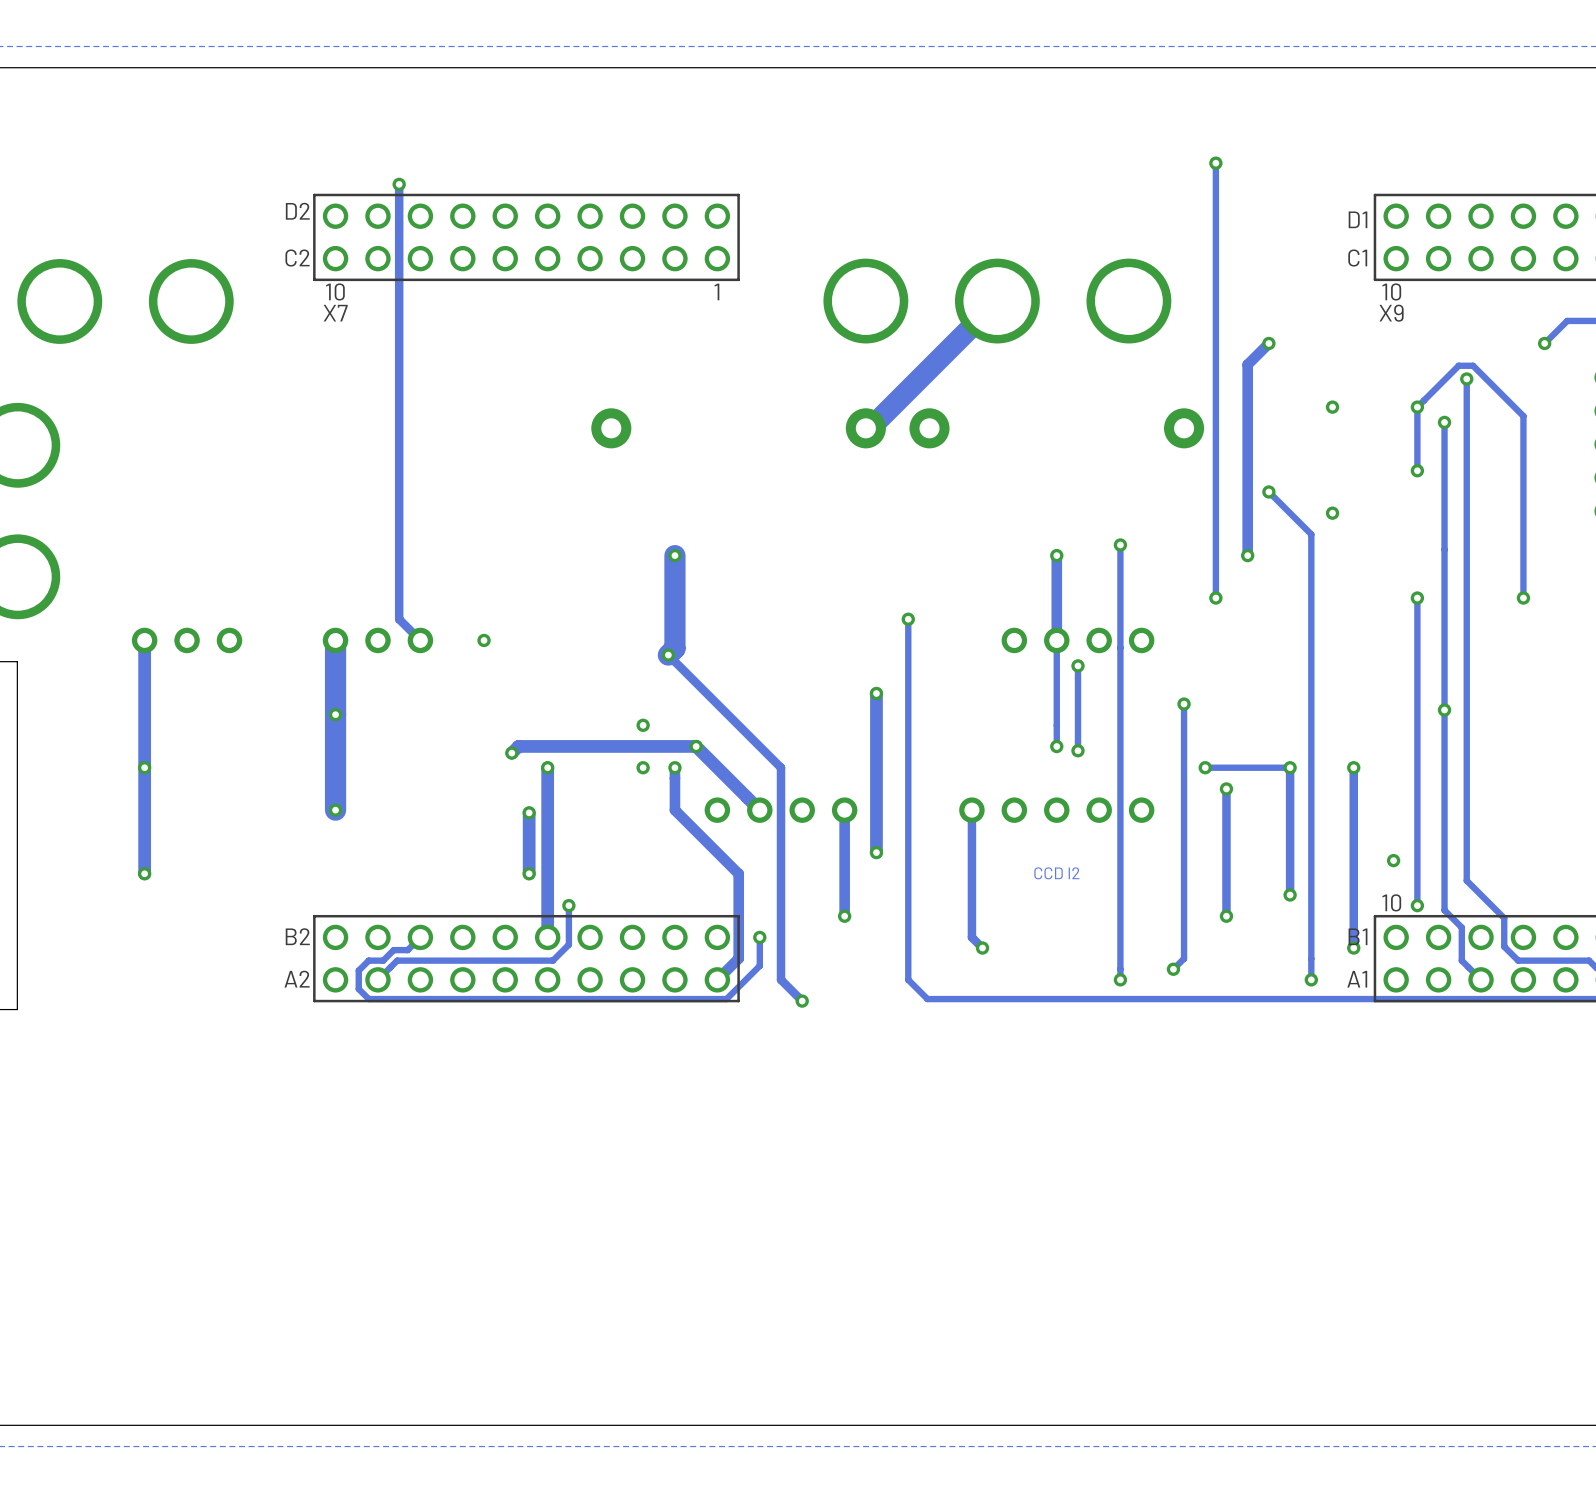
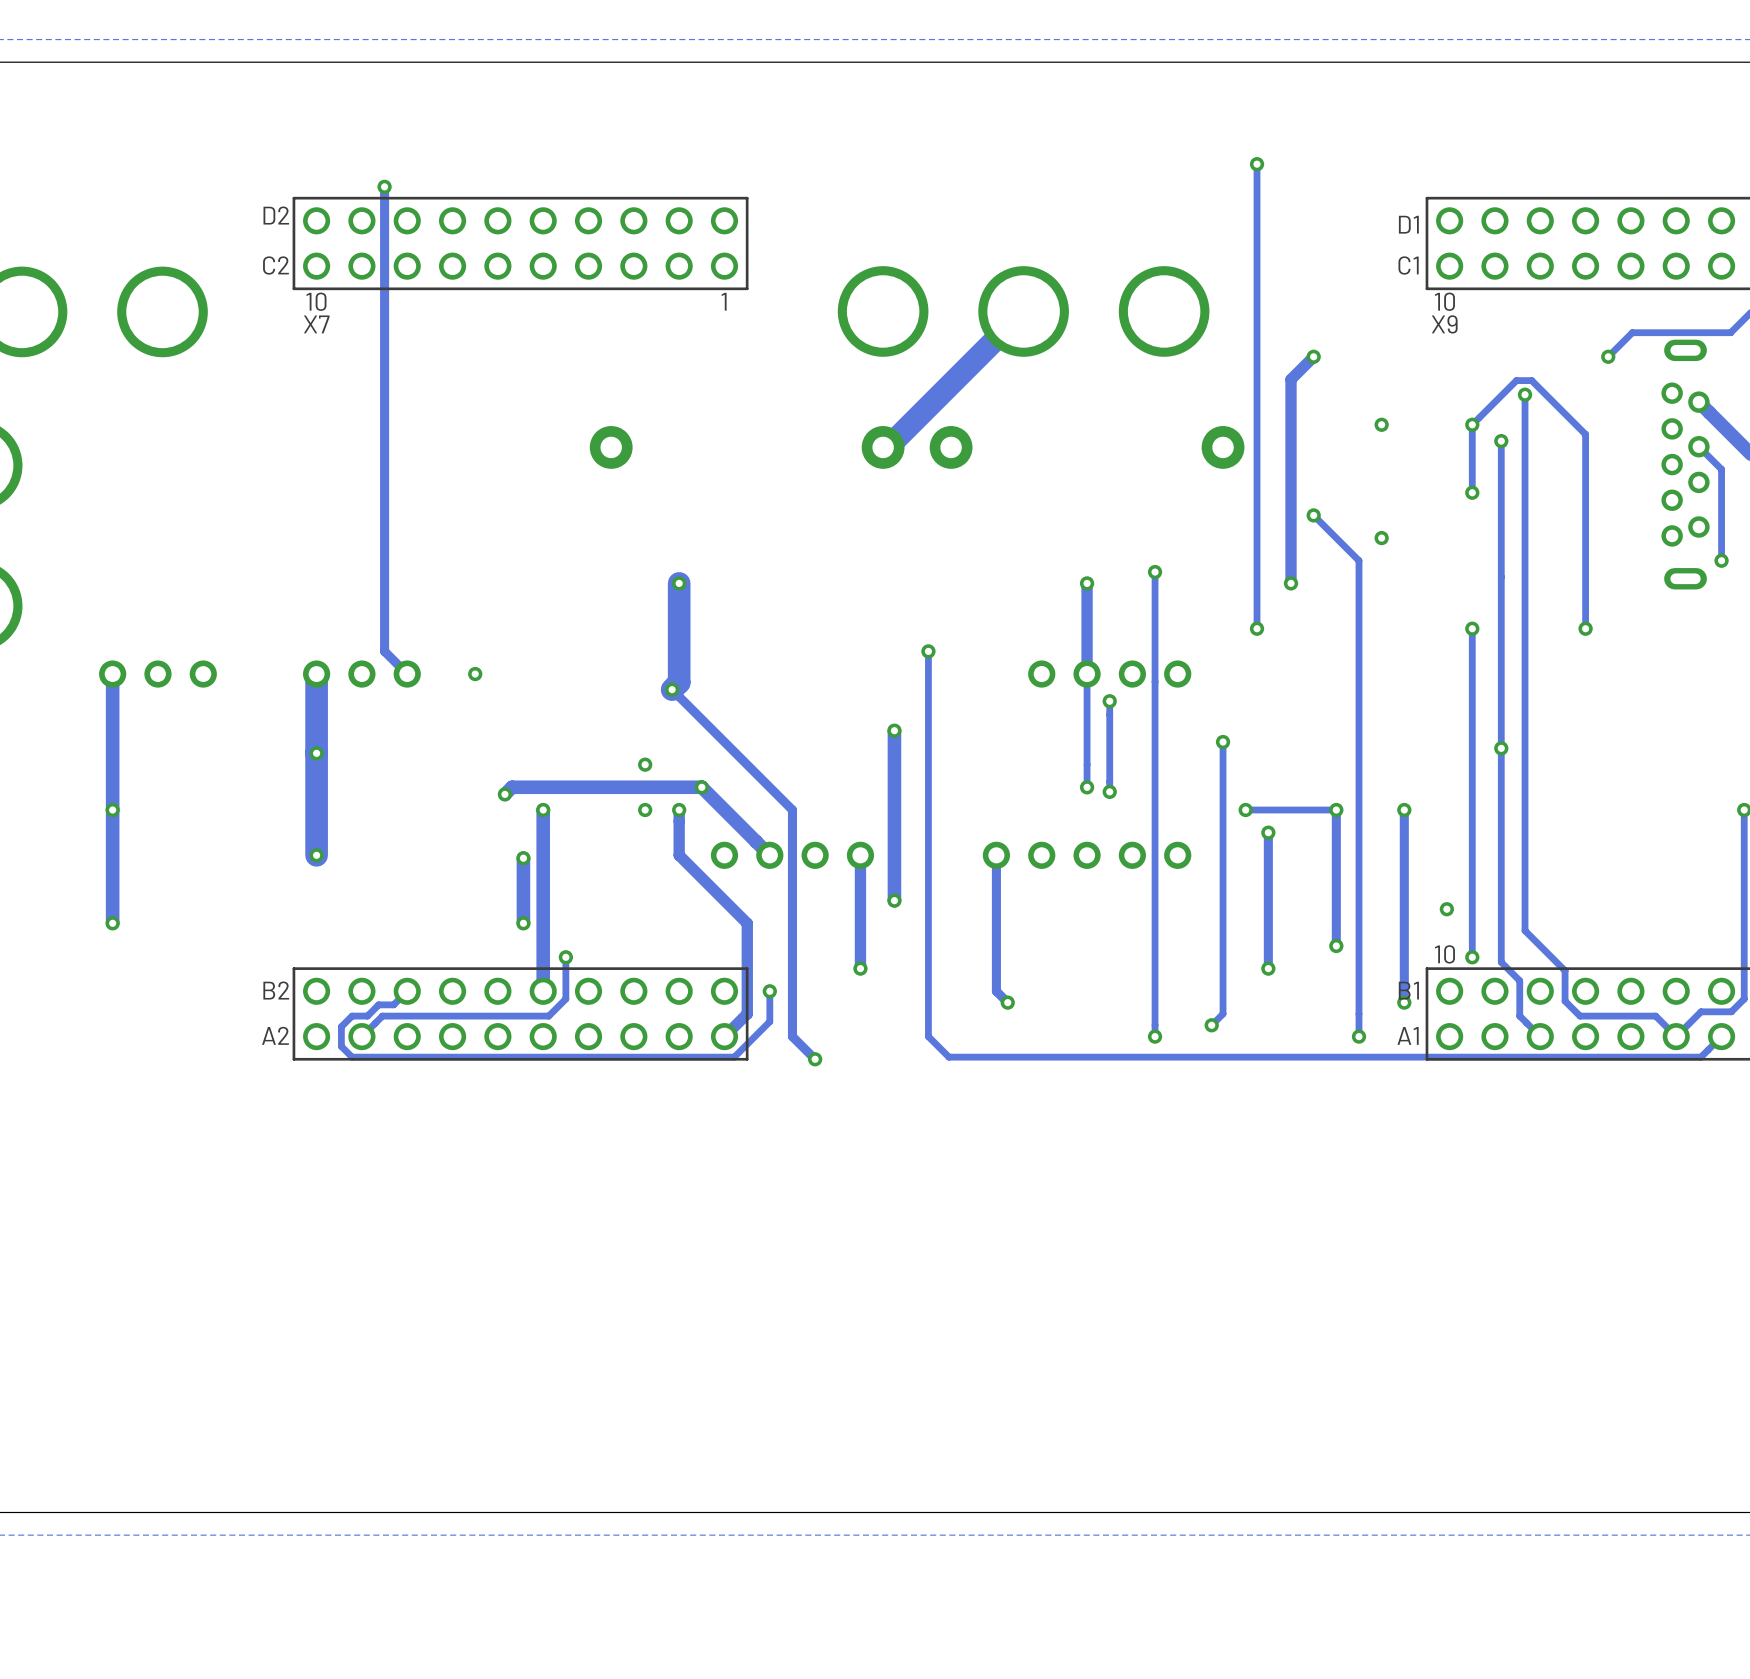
text: CCD I2 (1056, 873) -> none

